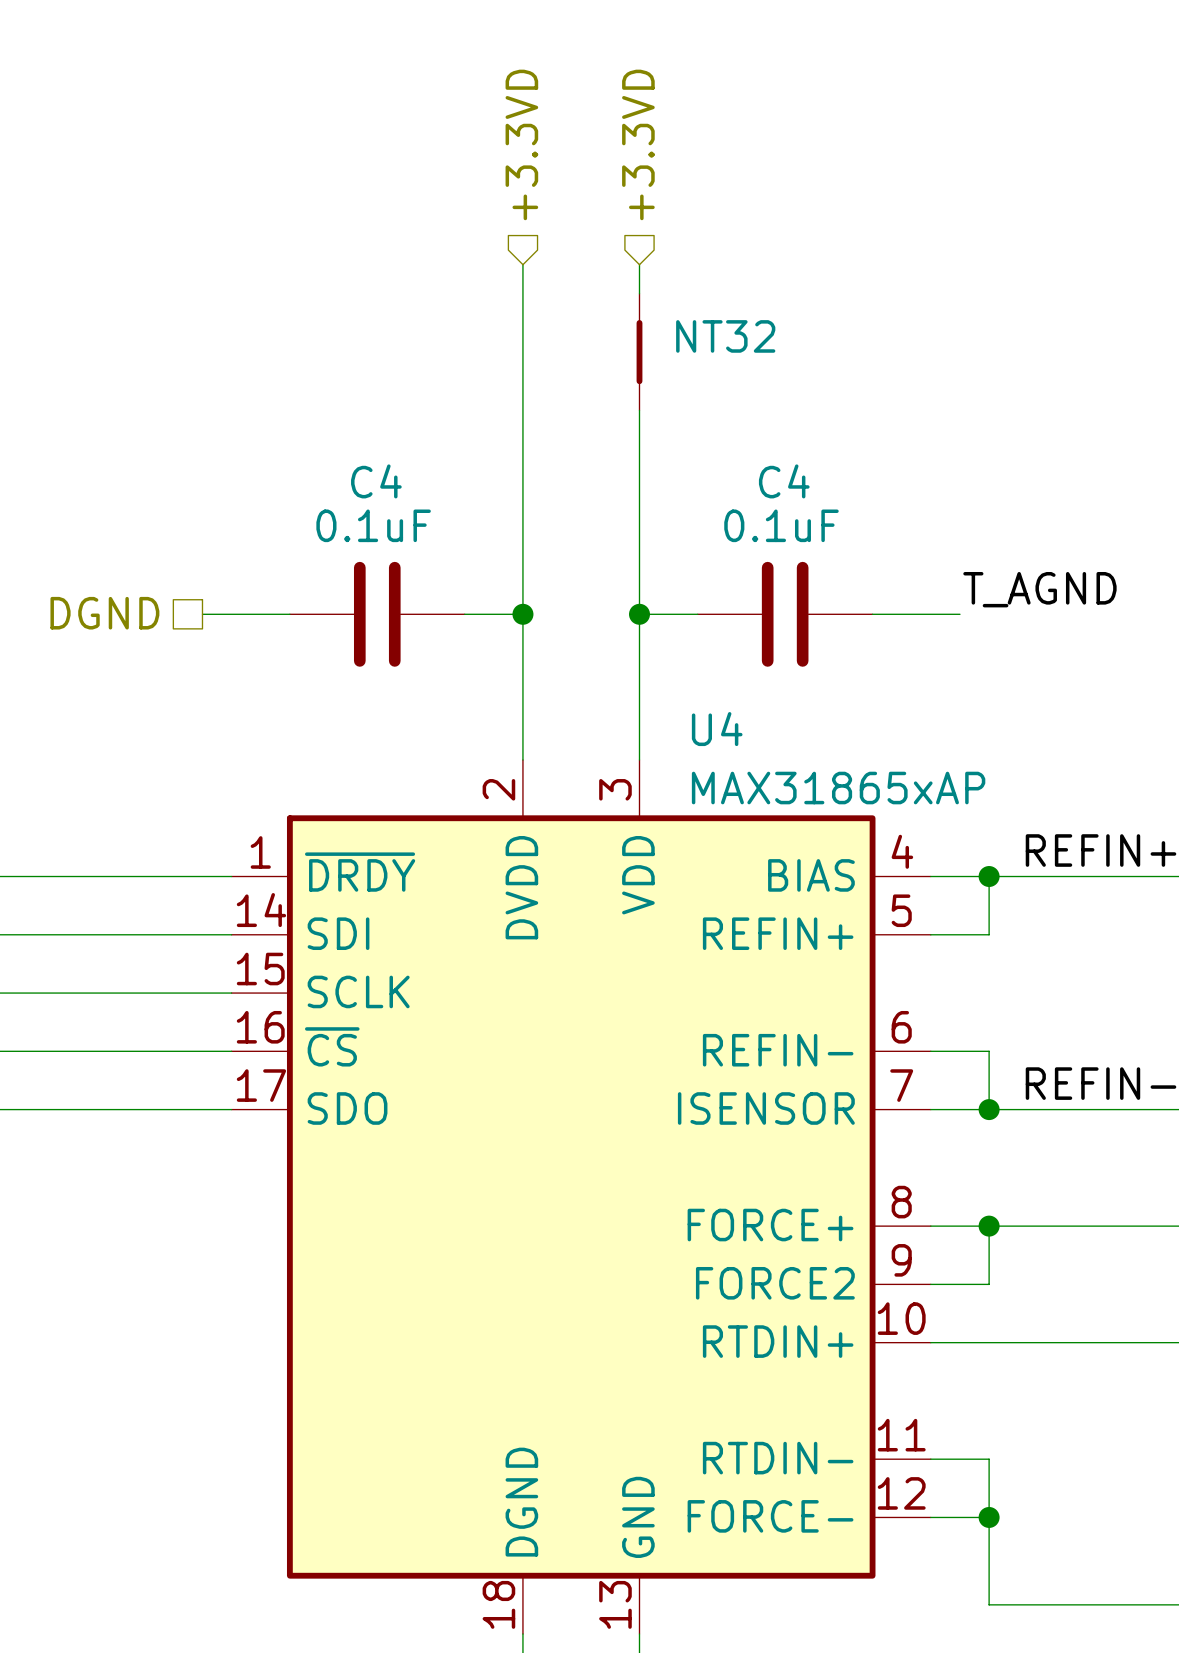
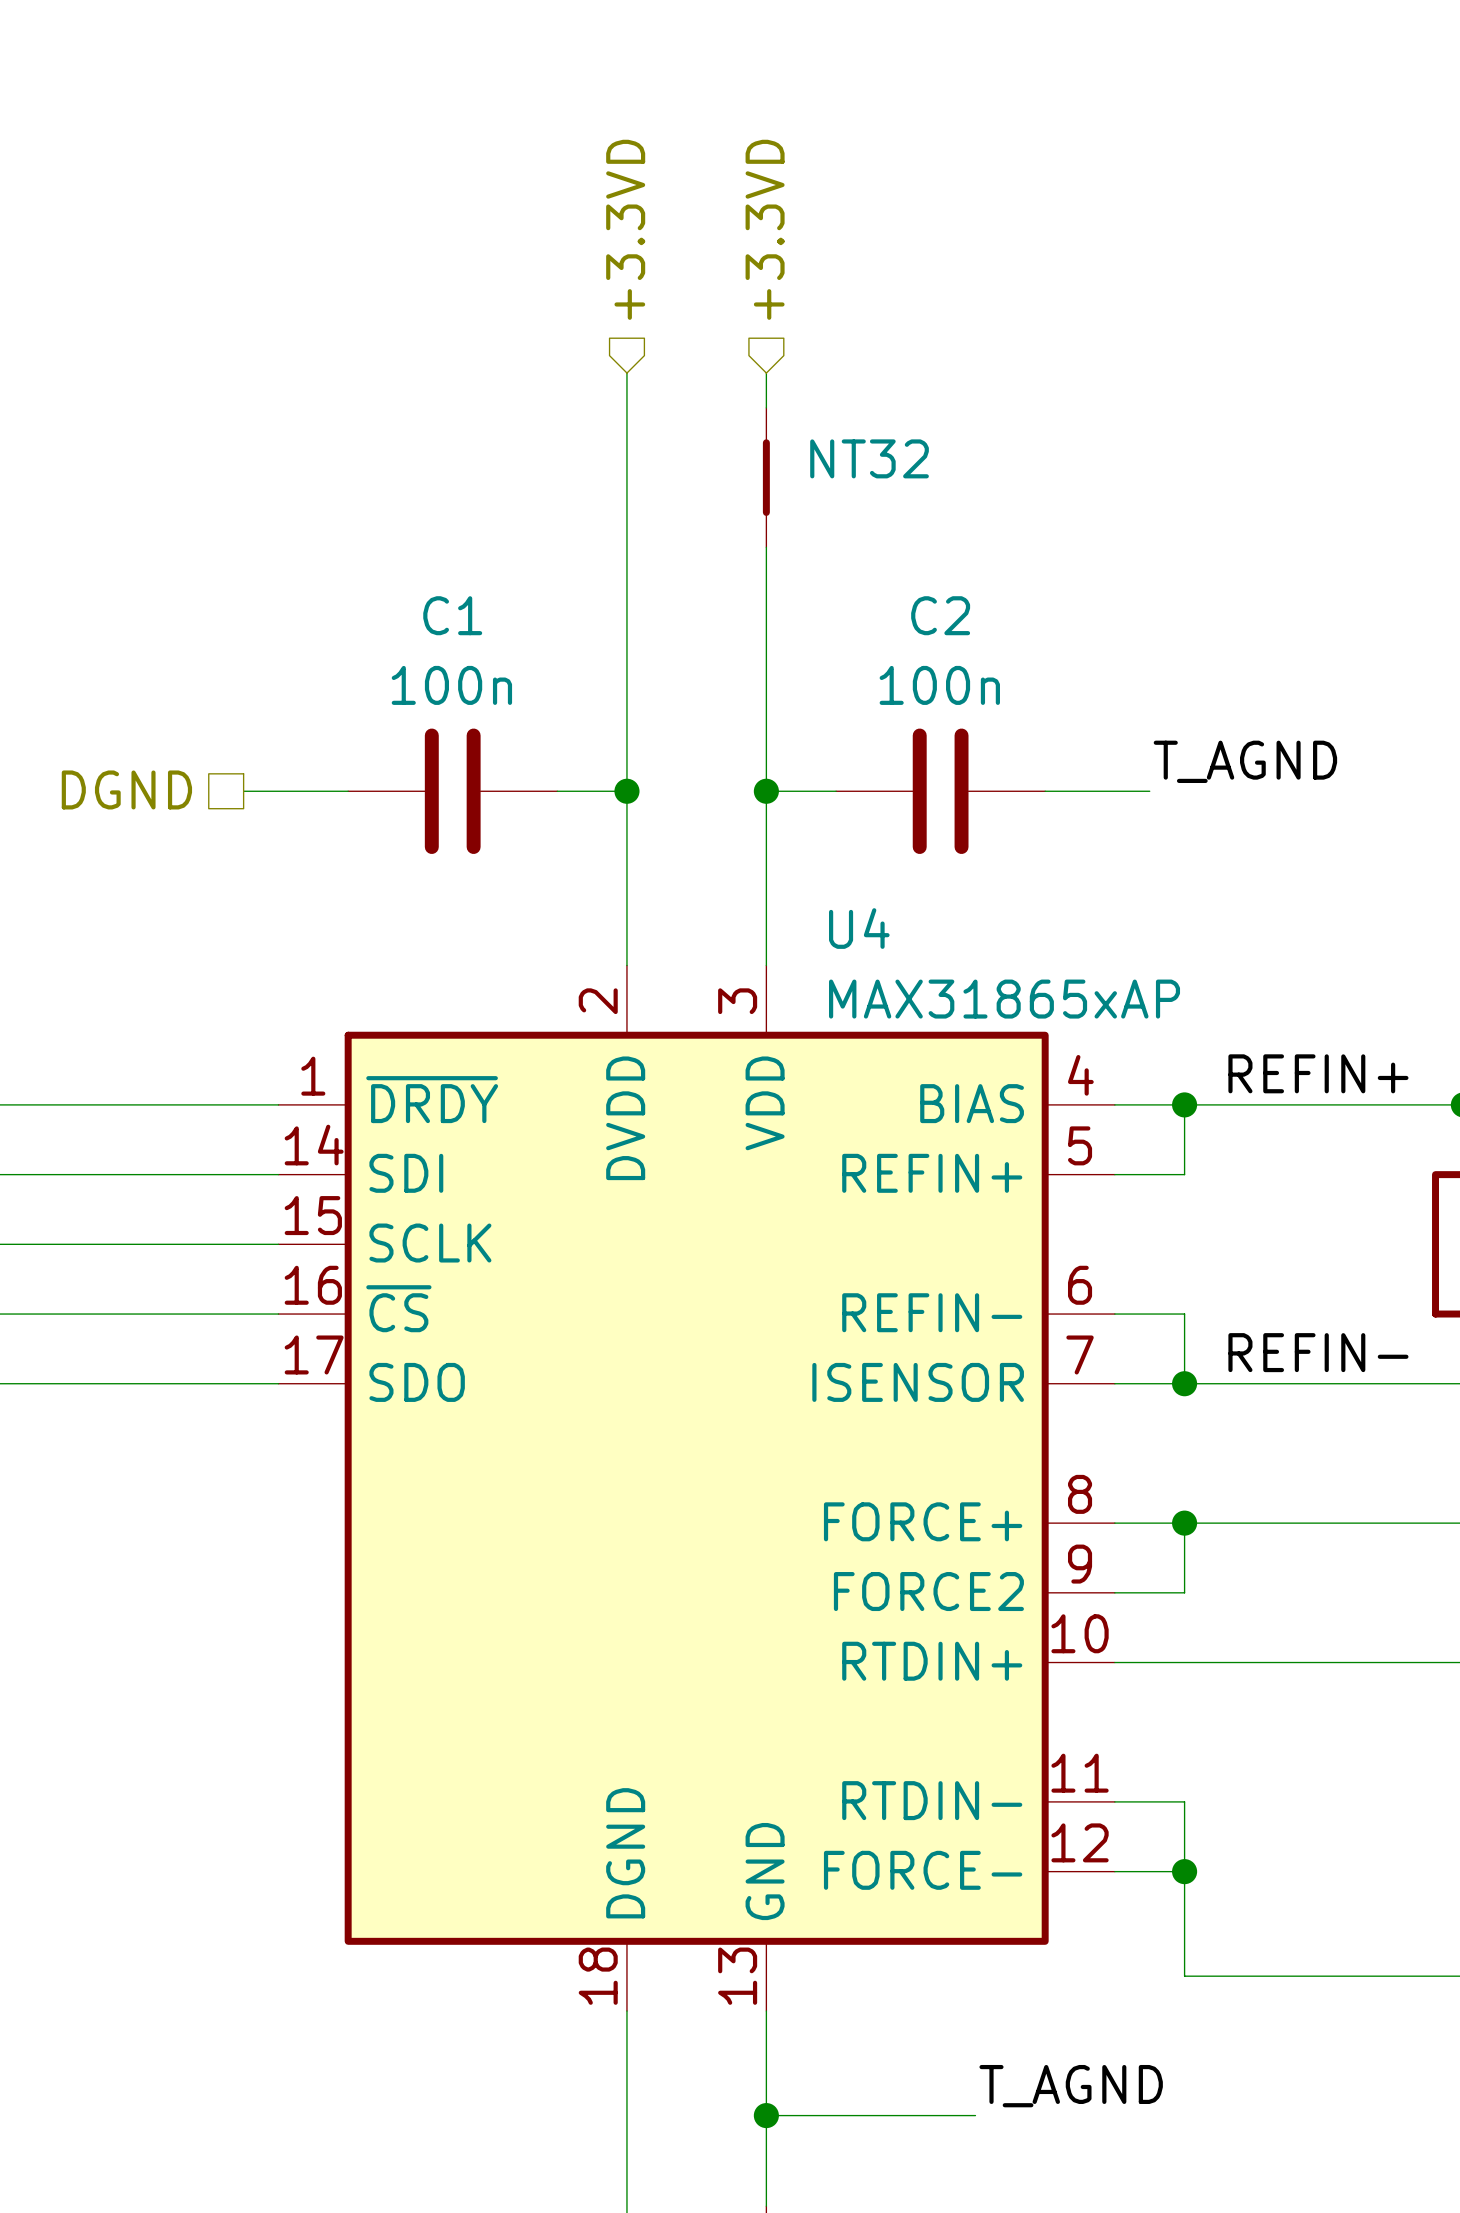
C4 name: C4 (376, 481) -> C1 (452, 615)
C4 name: C4 (784, 481) -> C2 (940, 615)
C4 value: 0.1uF (373, 525) -> 100n (451, 685)
C4 value: 0.1uF (781, 525) -> 100n (939, 685)

